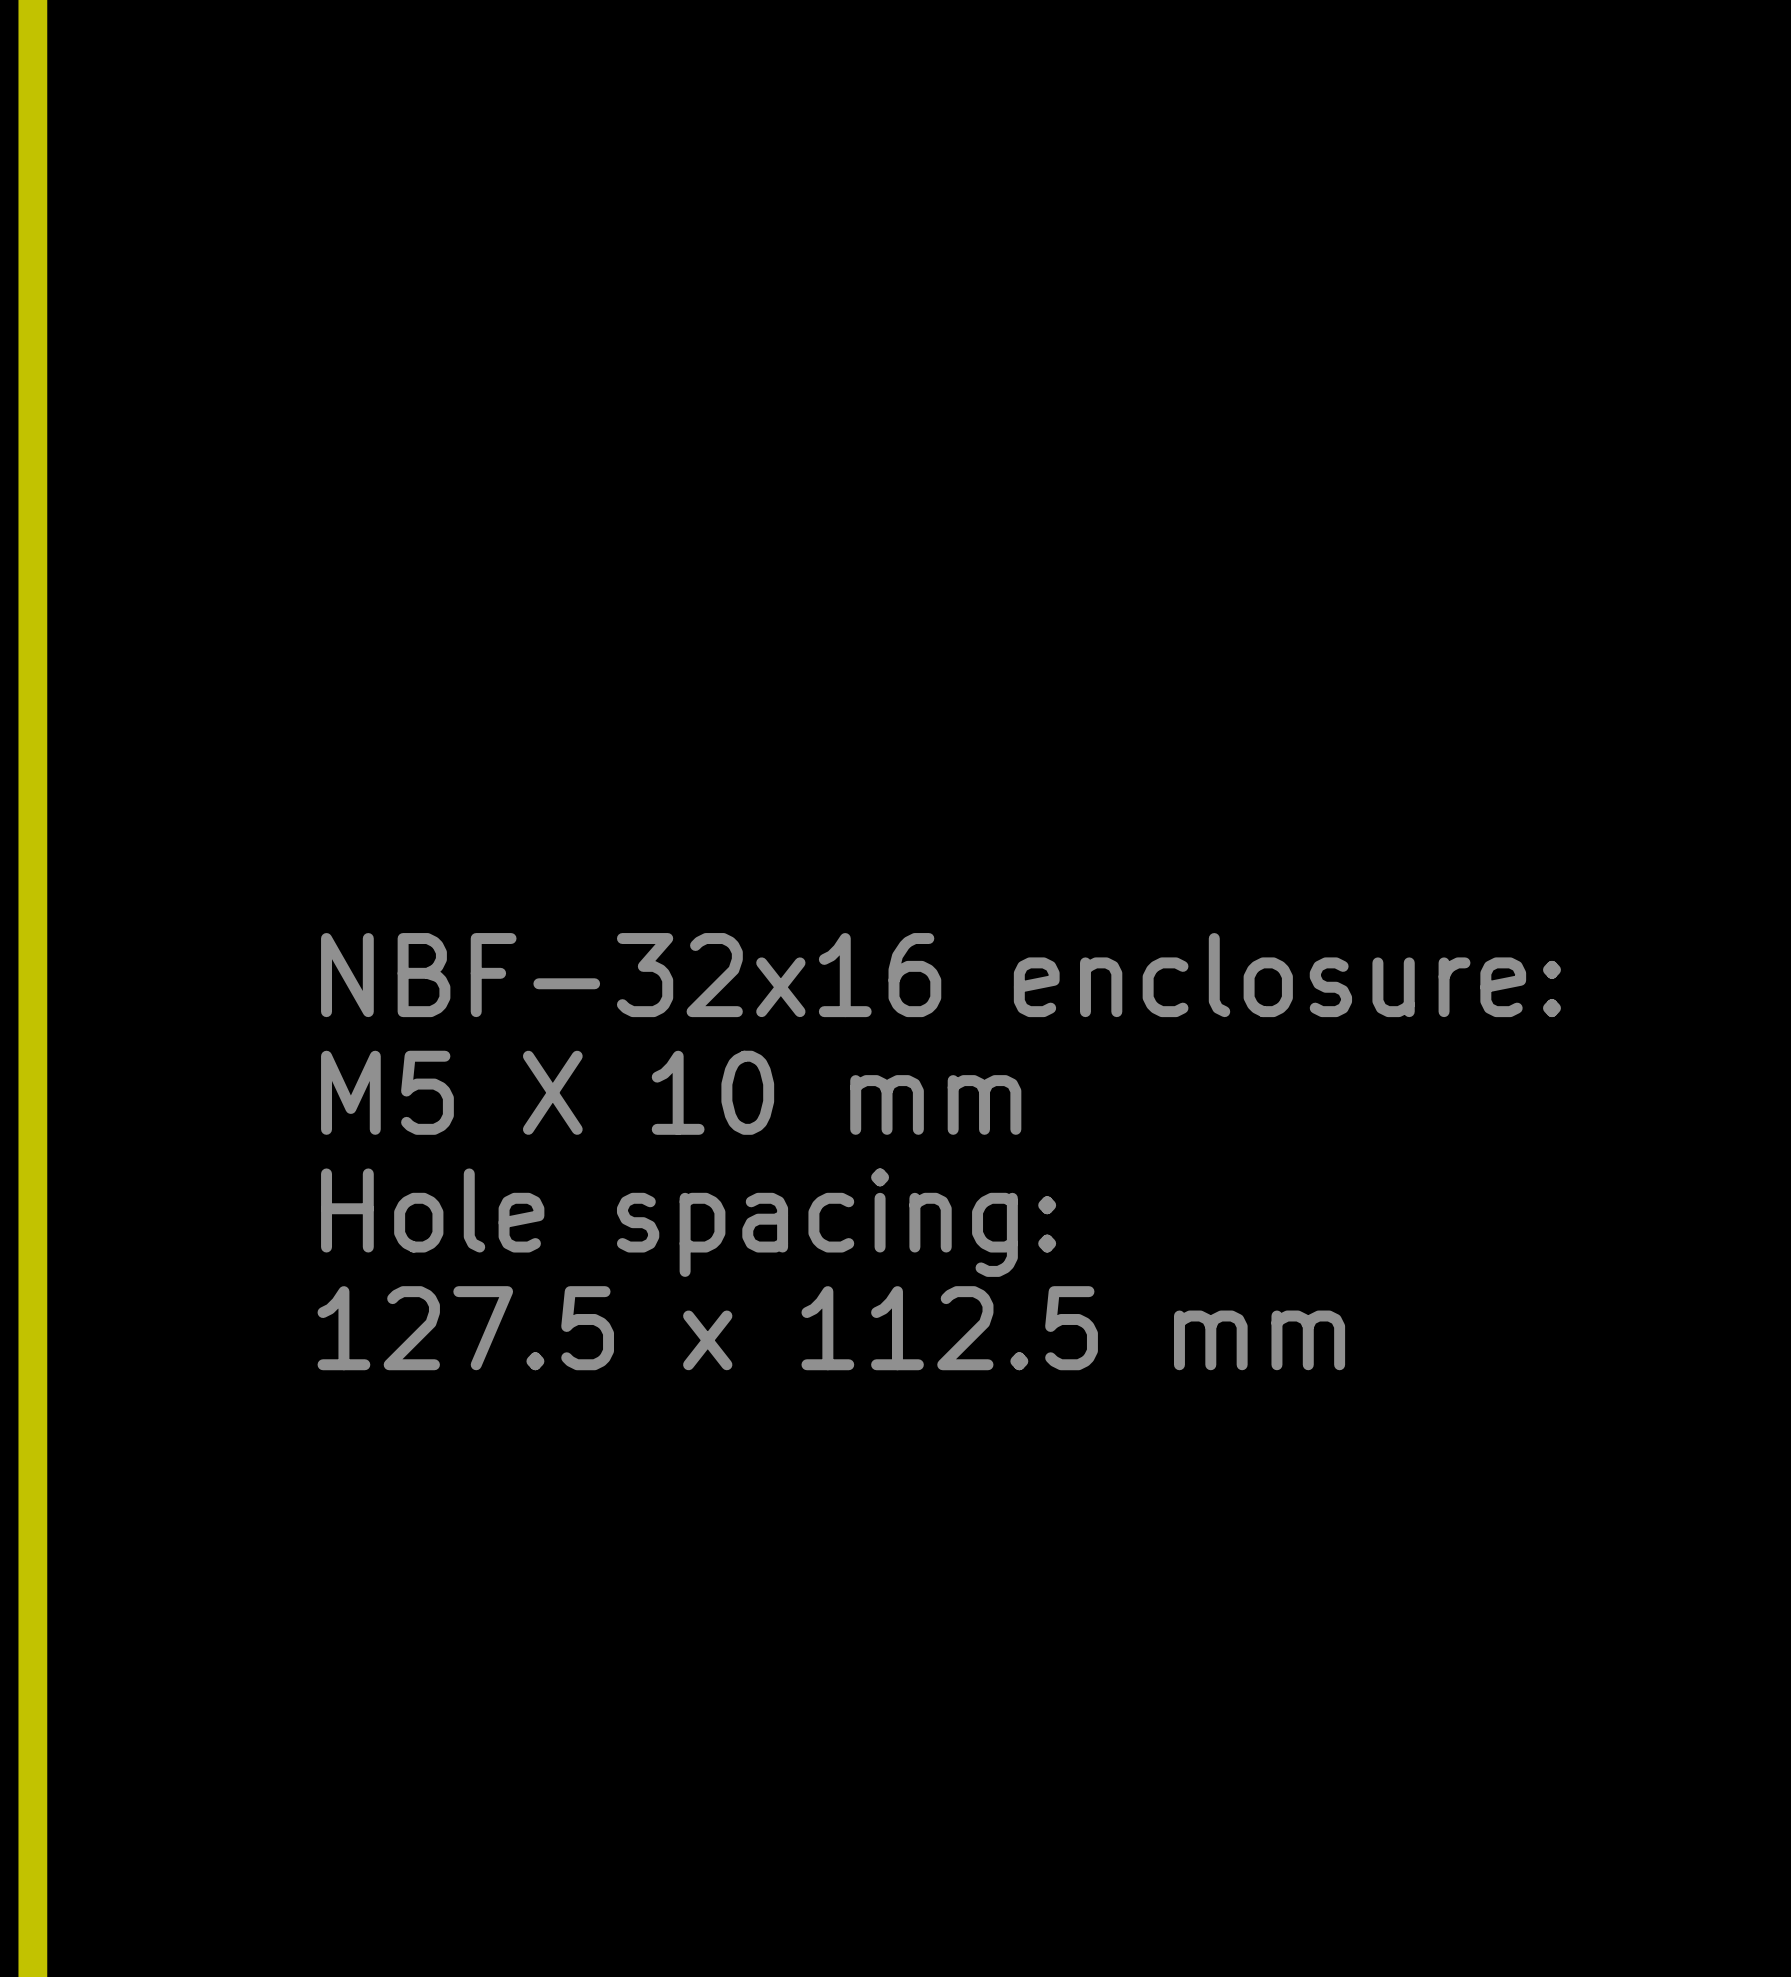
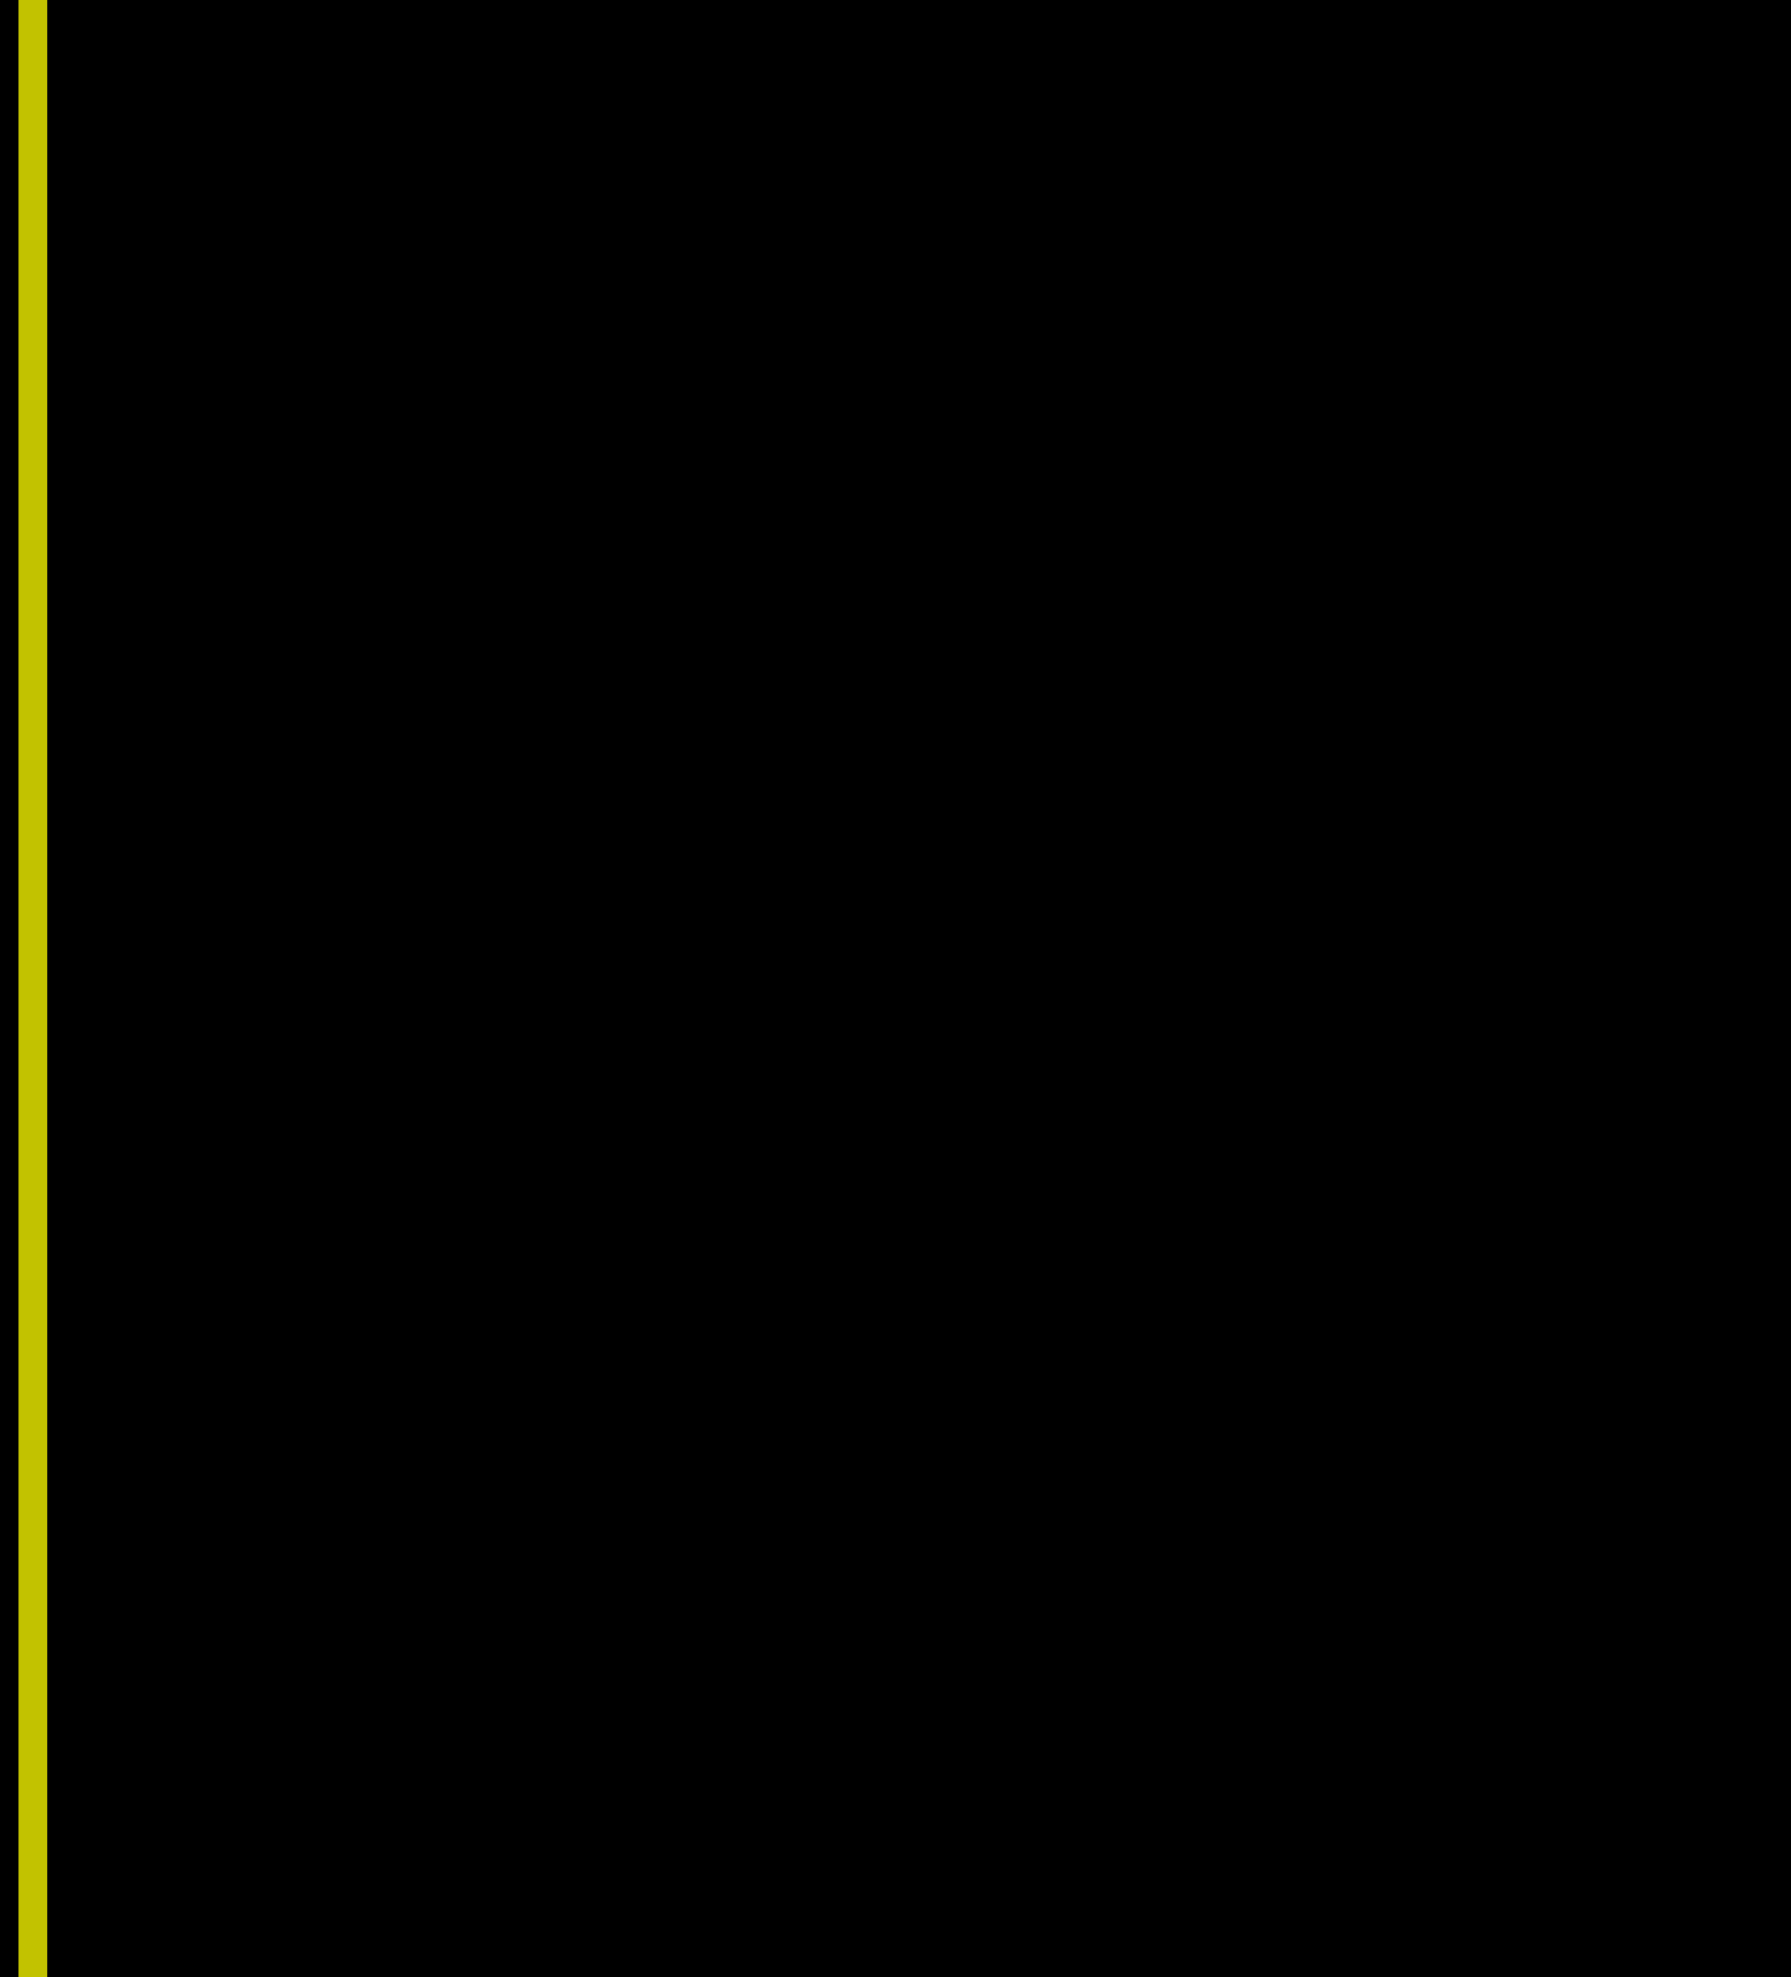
text: NBF-32x16 enclosure: (941, 975) -> none
text: M5 X 10 mm (671, 1092) -> none
text: Hole spacing: (688, 1222) -> none
text: 127.5 x 112.5 mm (831, 1328) -> none

